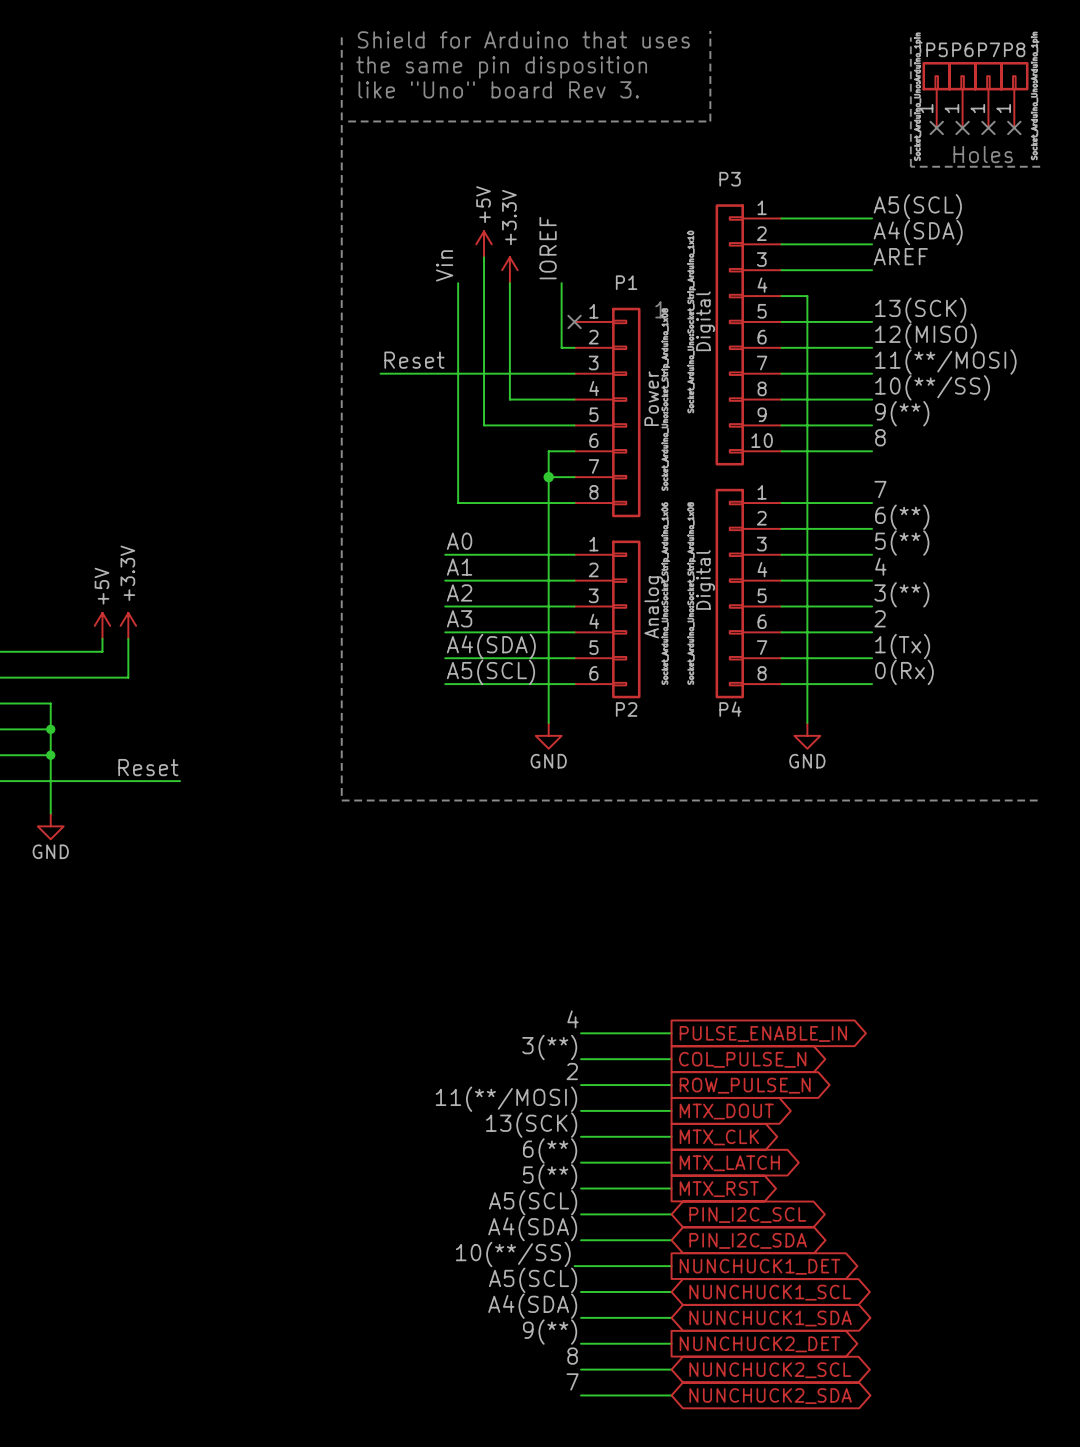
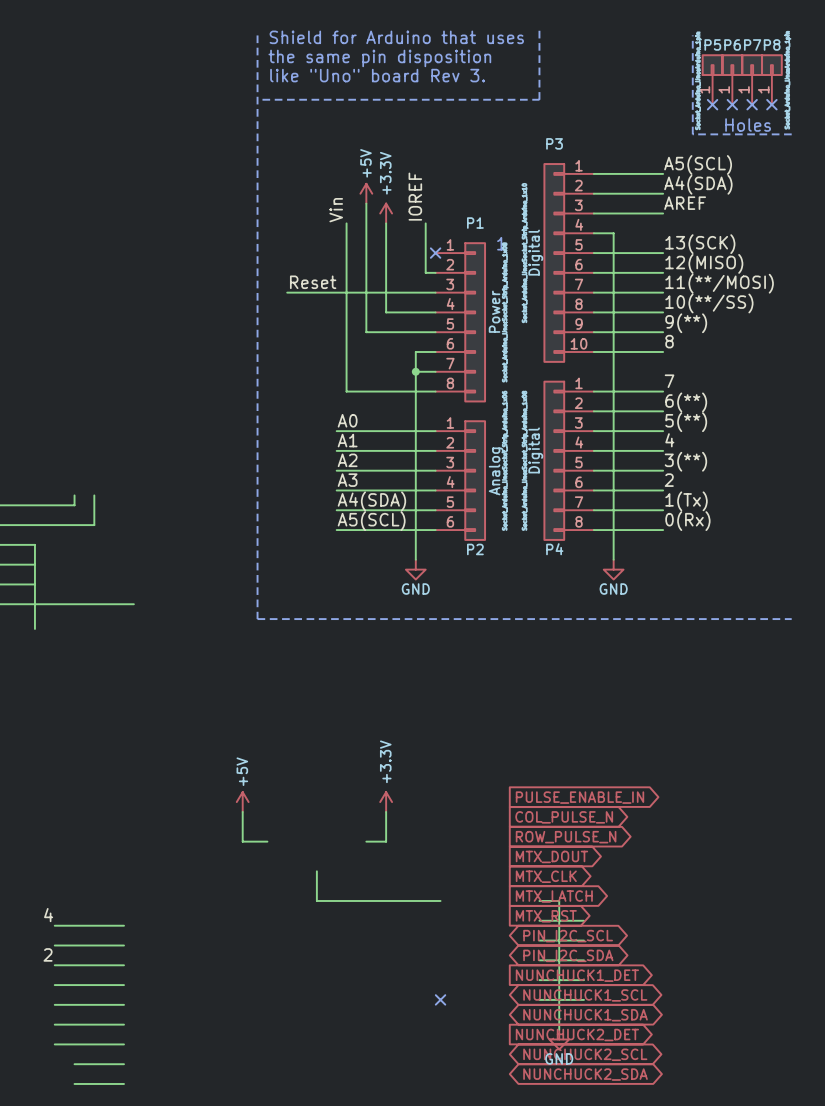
power symbol: +5V (102, 625) -> none
power symbol: +3.3V (128, 625) -> none
junction: (50, 729) -> none
junction: (50, 755) -> none
label: Reset (148, 767) -> none
power symbol: GND (50, 826) -> none
label: 4 (572, 1019) -> none
wire: (581, 1033) (671, 1033) -> none
power symbol: none -> +5V (242, 802)
power symbol: none -> +3.3V (386, 802)
label: 3(**) (549, 1047) -> none
wire: none -> (242, 811) (242, 841) (267, 841)
wire: none -> (386, 811) (386, 841) (366, 841)
wire: (581, 1059) (671, 1059) -> none
label: 2 (572, 1071) -> none
wire: (581, 1085) (671, 1085) -> none
label: 11(**/MOSI) (506, 1099) -> none
wire: (581, 1110) (671, 1110) -> none
label: 13(SCK) (531, 1125) -> none
wire: none -> (316, 871) (316, 900) (440, 900)
wire: (581, 1136) (671, 1136) -> none
label: 6(**) (550, 1150) -> none
wire: (581, 1162) (671, 1162) -> none
wire: none -> (539, 900) (559, 900) (559, 1029)
label: 5(**) (550, 1176) -> none
label: none -> 4 (48, 915)
wire: (581, 1188) (671, 1188) -> none
wire: none -> (539, 920) (583, 920)
wire: none -> (54, 925) (123, 925)
label: A5(SCL) (533, 1202) -> none
wire: (581, 1214) (671, 1214) -> none
wire: none -> (539, 940) (583, 940)
wire: none -> (54, 945) (123, 945)
label: A4(SDA) (532, 1228) -> none
label: none -> 2 (48, 954)
wire: (581, 1240) (671, 1240) -> none
wire: none -> (539, 960) (583, 960)
wire: none -> (54, 965) (123, 965)
label: 10(**/SS) (513, 1254) -> none
wire: (574, 1266) (671, 1266) -> none
wire: none -> (539, 980) (583, 980)
wire: none -> (54, 985) (123, 985)
label: A5(SCL) (533, 1280) -> none
wire: (581, 1292) (671, 1292) -> none
no-connect mark: none -> (440, 999)
wire: none -> (539, 999) (583, 999)
wire: none -> (54, 1004) (123, 1004)
label: A4(SDA) (532, 1306) -> none
wire: (581, 1317) (671, 1317) -> none
wire: none -> (54, 1024) (123, 1024)
label: 9(**) (550, 1332) -> none
wire: (581, 1343) (671, 1343) -> none
power symbol: none -> GND (559, 1039)
wire: none -> (54, 1044) (123, 1044)
label: 8 (572, 1356) -> none
wire: (581, 1369) (671, 1369) -> none
label: 7 (572, 1381) -> none
wire: none -> (74, 1064) (123, 1064)
wire: (581, 1395) (671, 1395) -> none
wire: none -> (74, 1083) (123, 1083)

